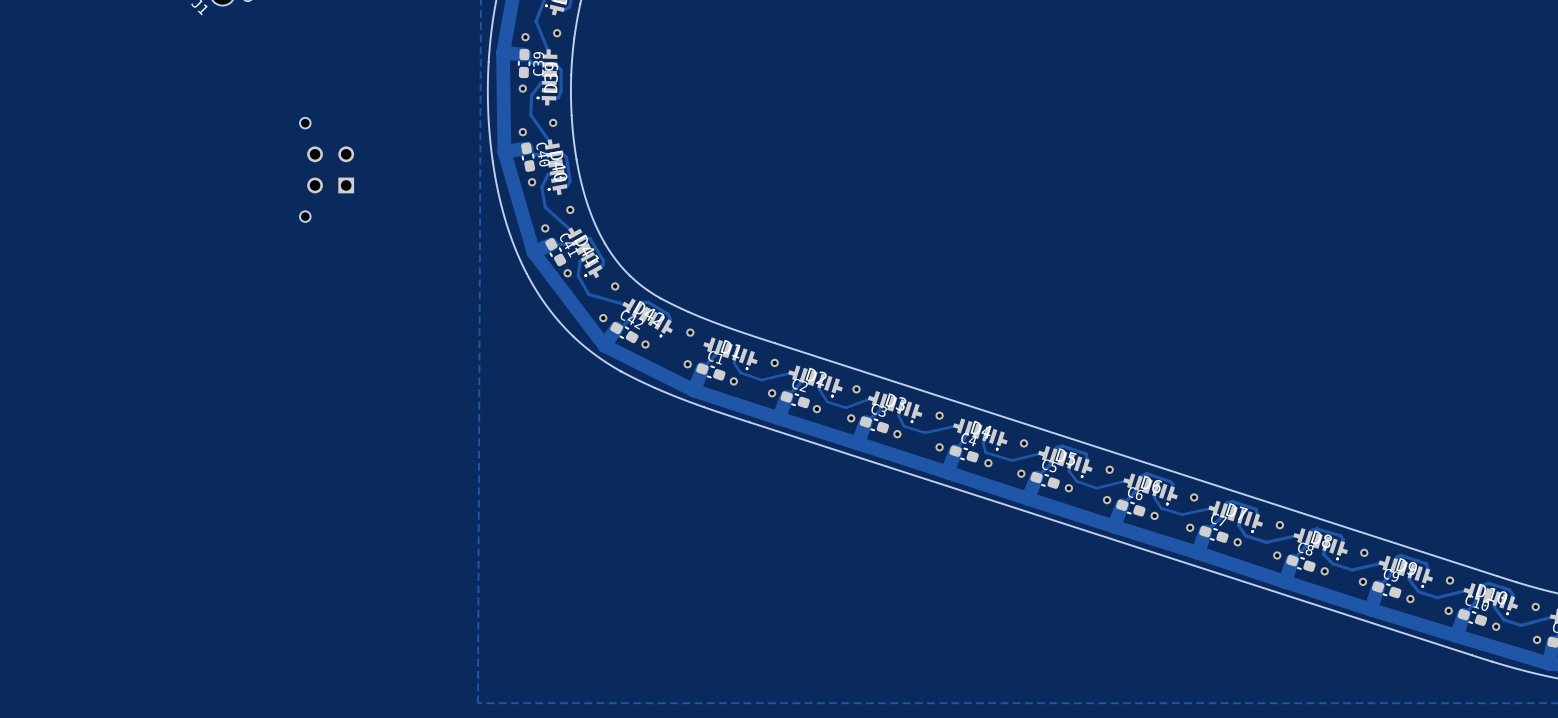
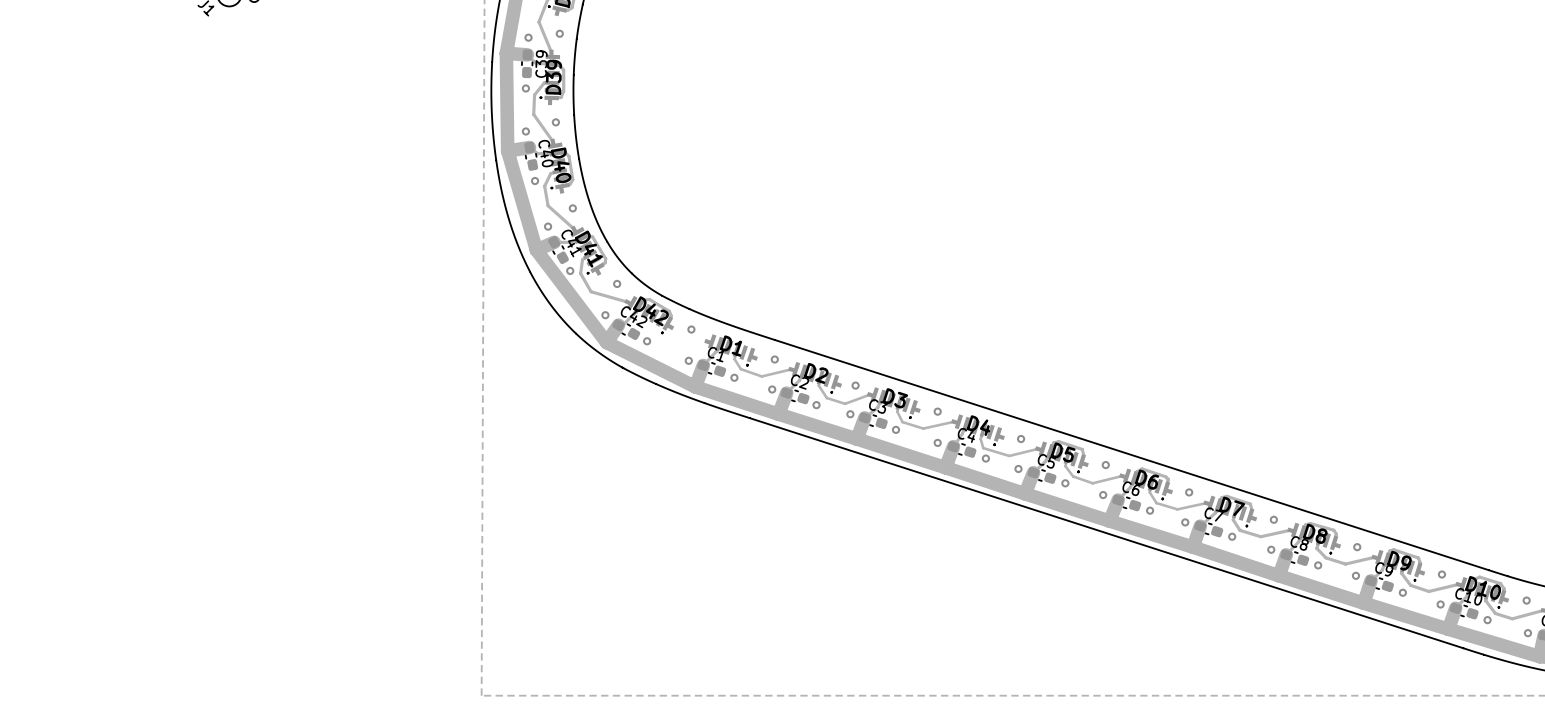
part: (327, 169) -> none

